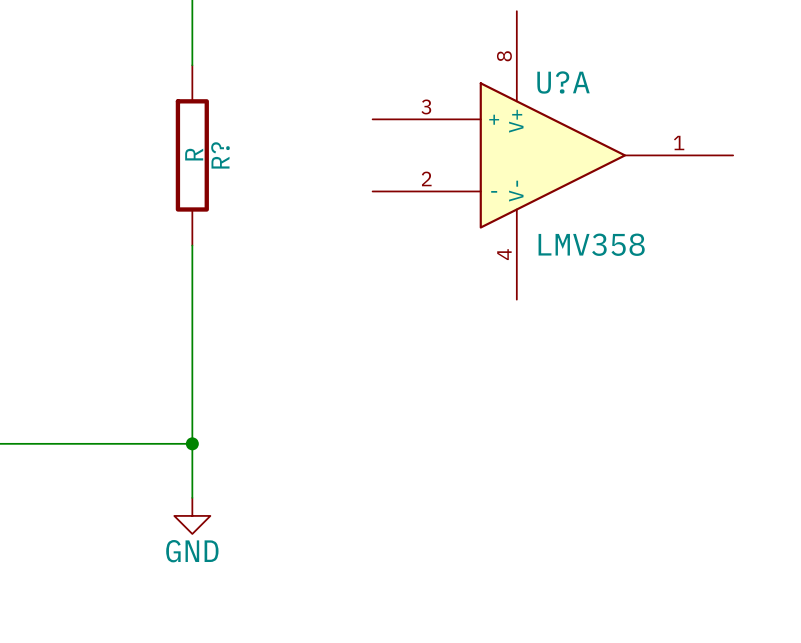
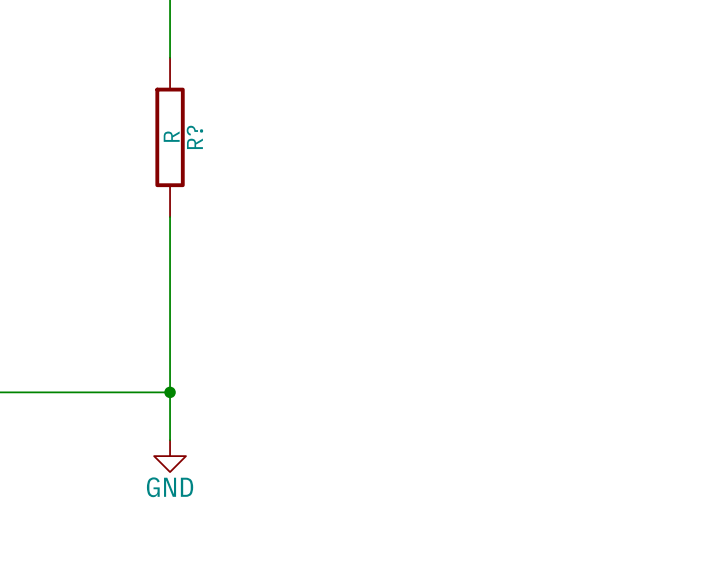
U?A: LMV358 (552, 155) -> none

